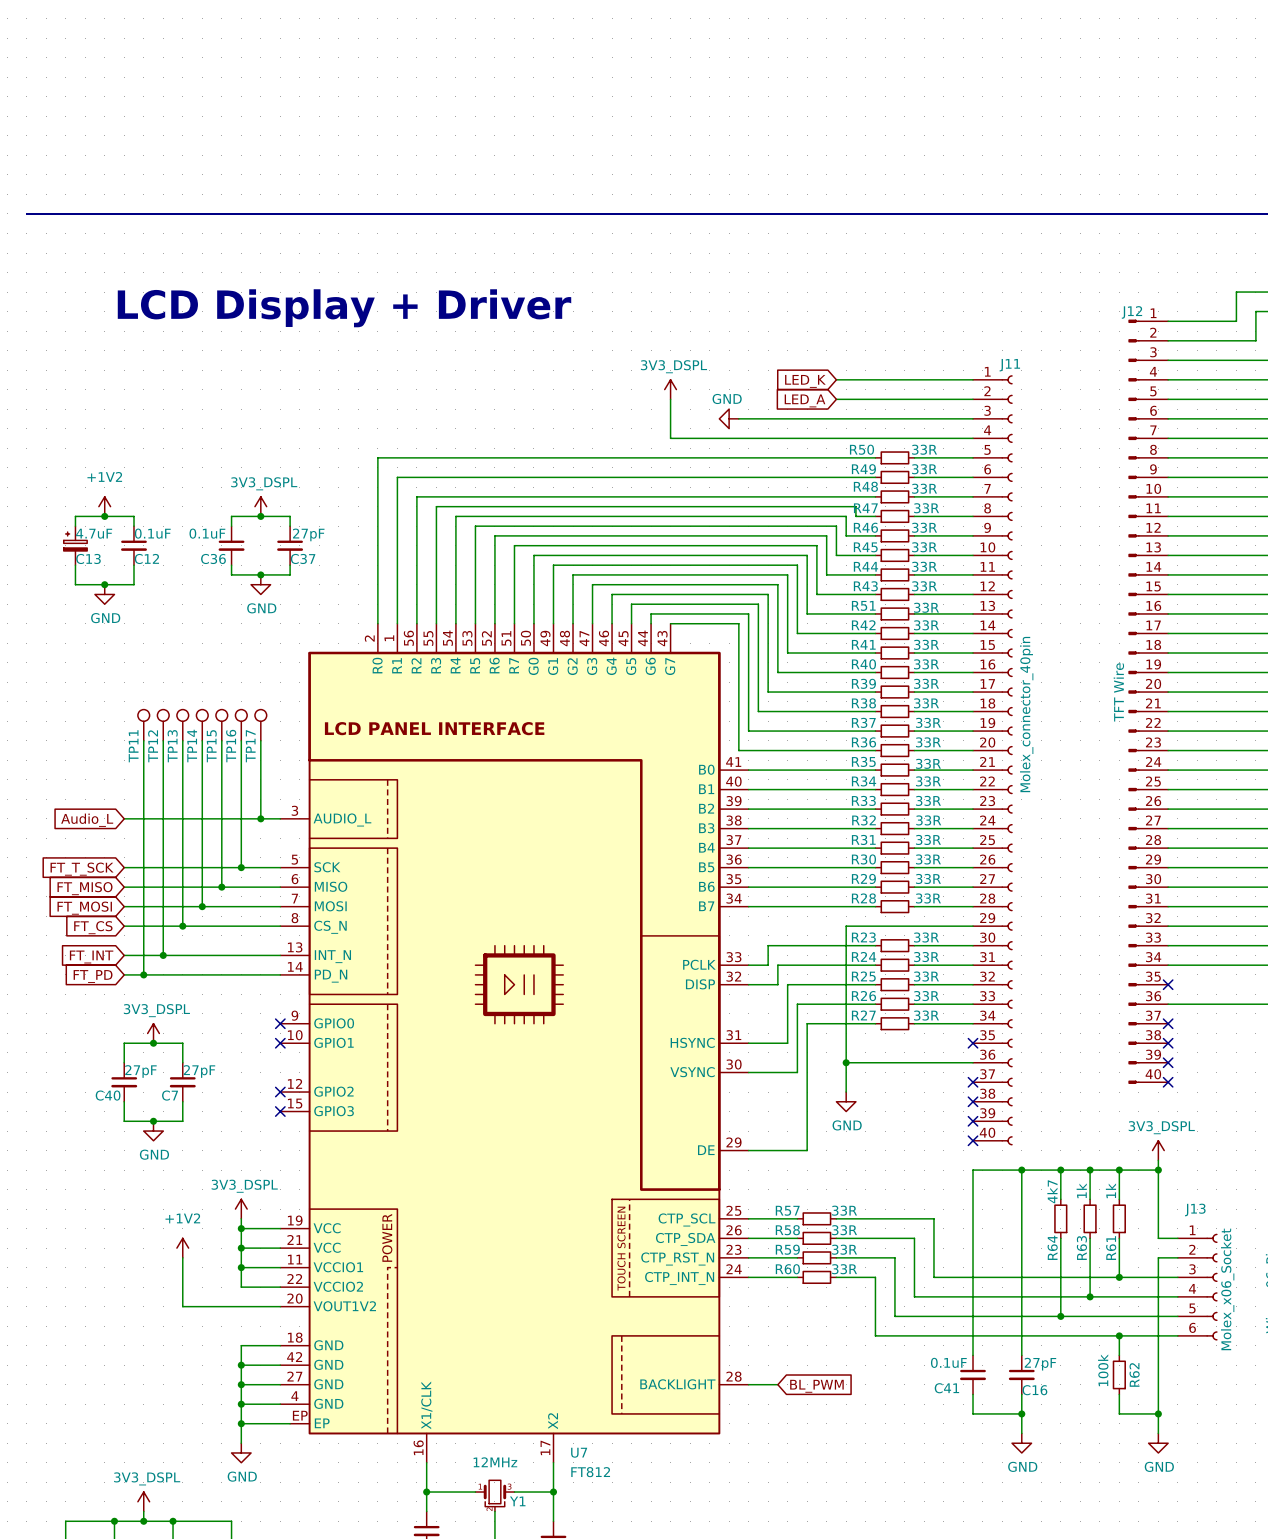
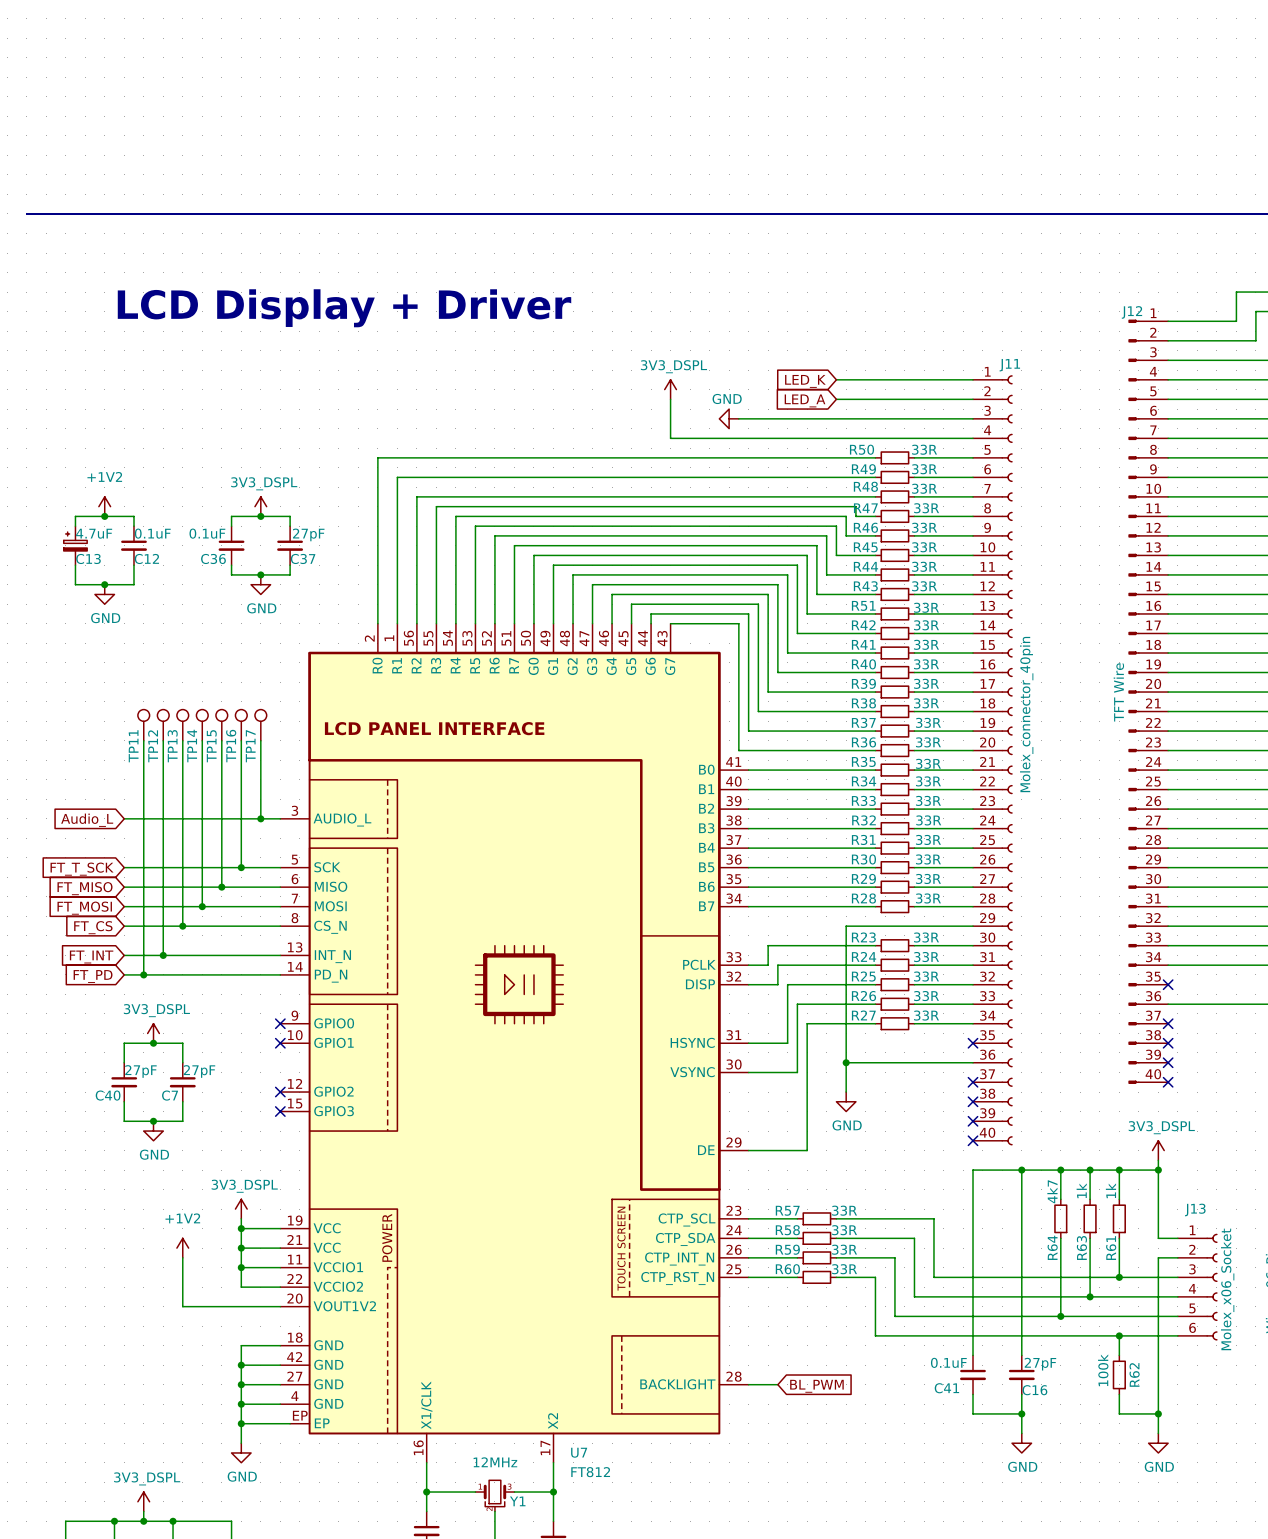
U7 pin number: 25 (733, 1210) -> 23 (733, 1210)
U7 pin number: 26 (734, 1230) -> 24 (734, 1230)
U7 pin number: 23 (733, 1249) -> 26 (734, 1249)
U7 pin name: CTP_RST_N (677, 1258) -> CTP_INT_N (679, 1258)
U7 pin number: 24 (734, 1269) -> 25 (733, 1269)
U7 pin name: CTP_INT_N (679, 1278) -> CTP_RST_N (677, 1278)

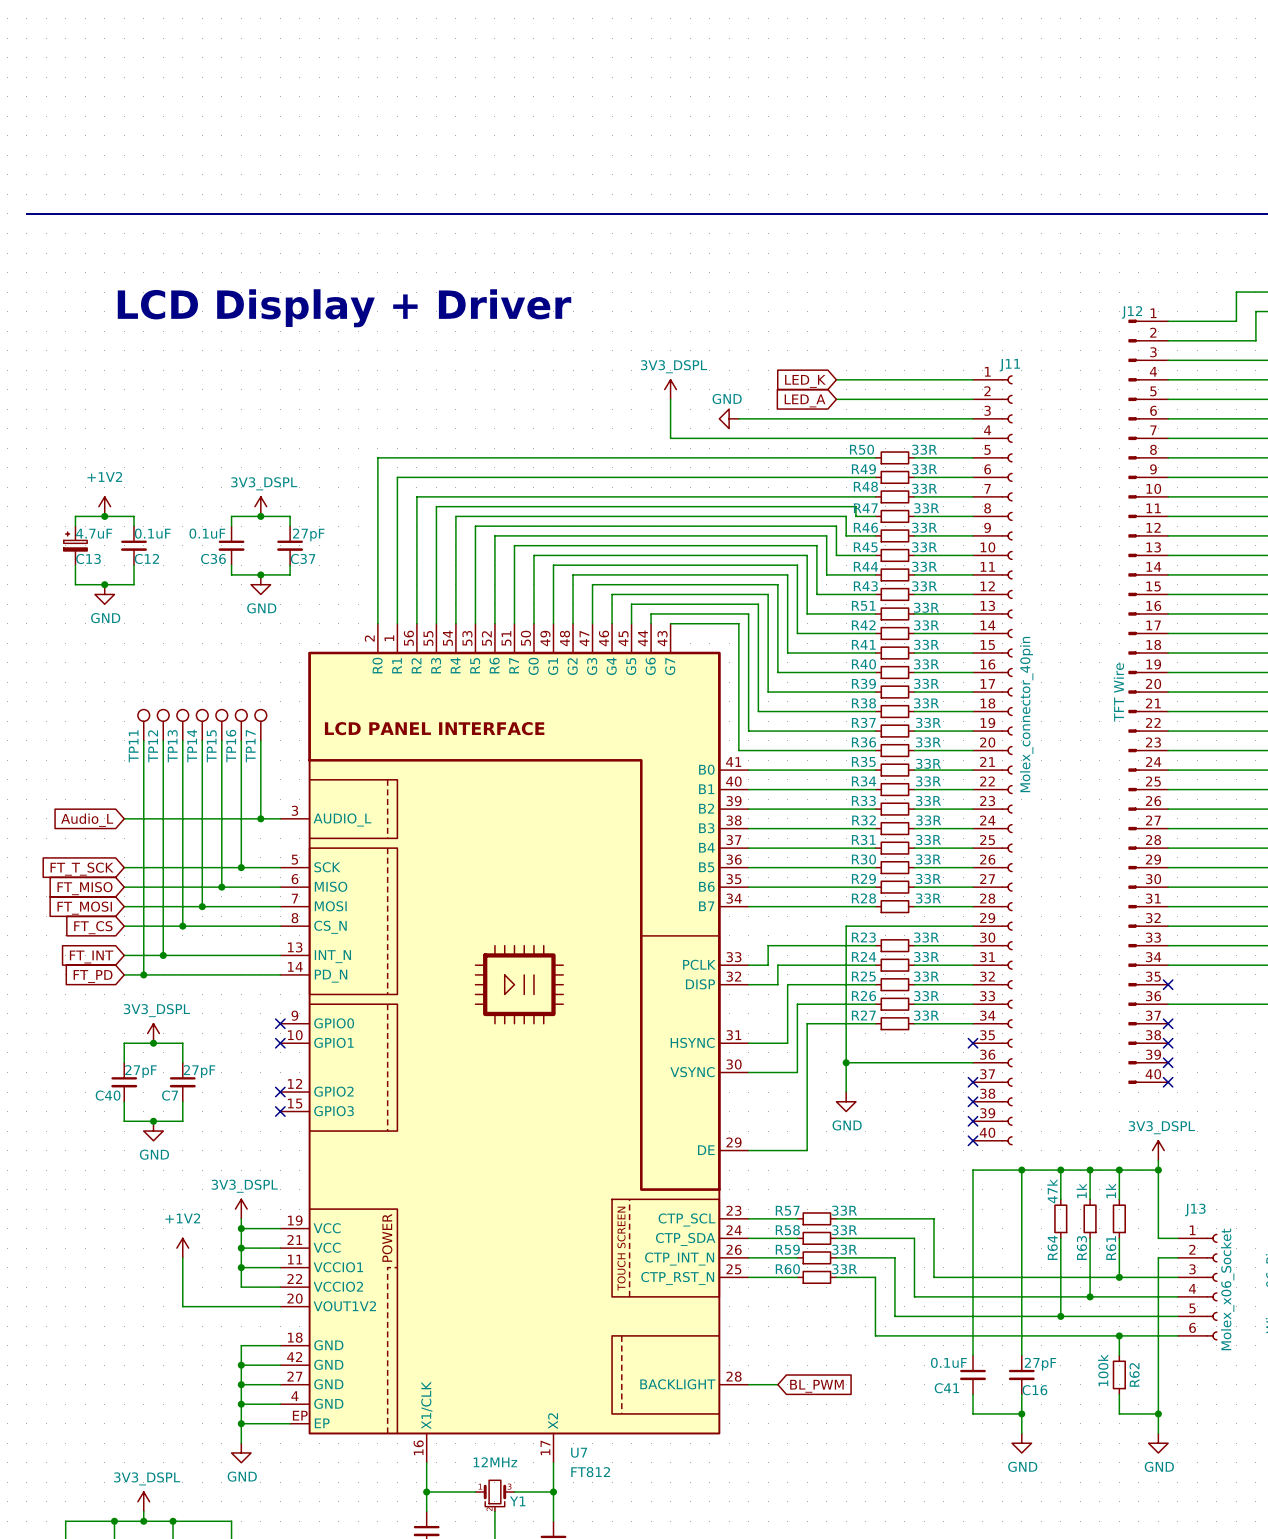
R64 value: 4k7 (1052, 1191) -> 47k (1052, 1191)

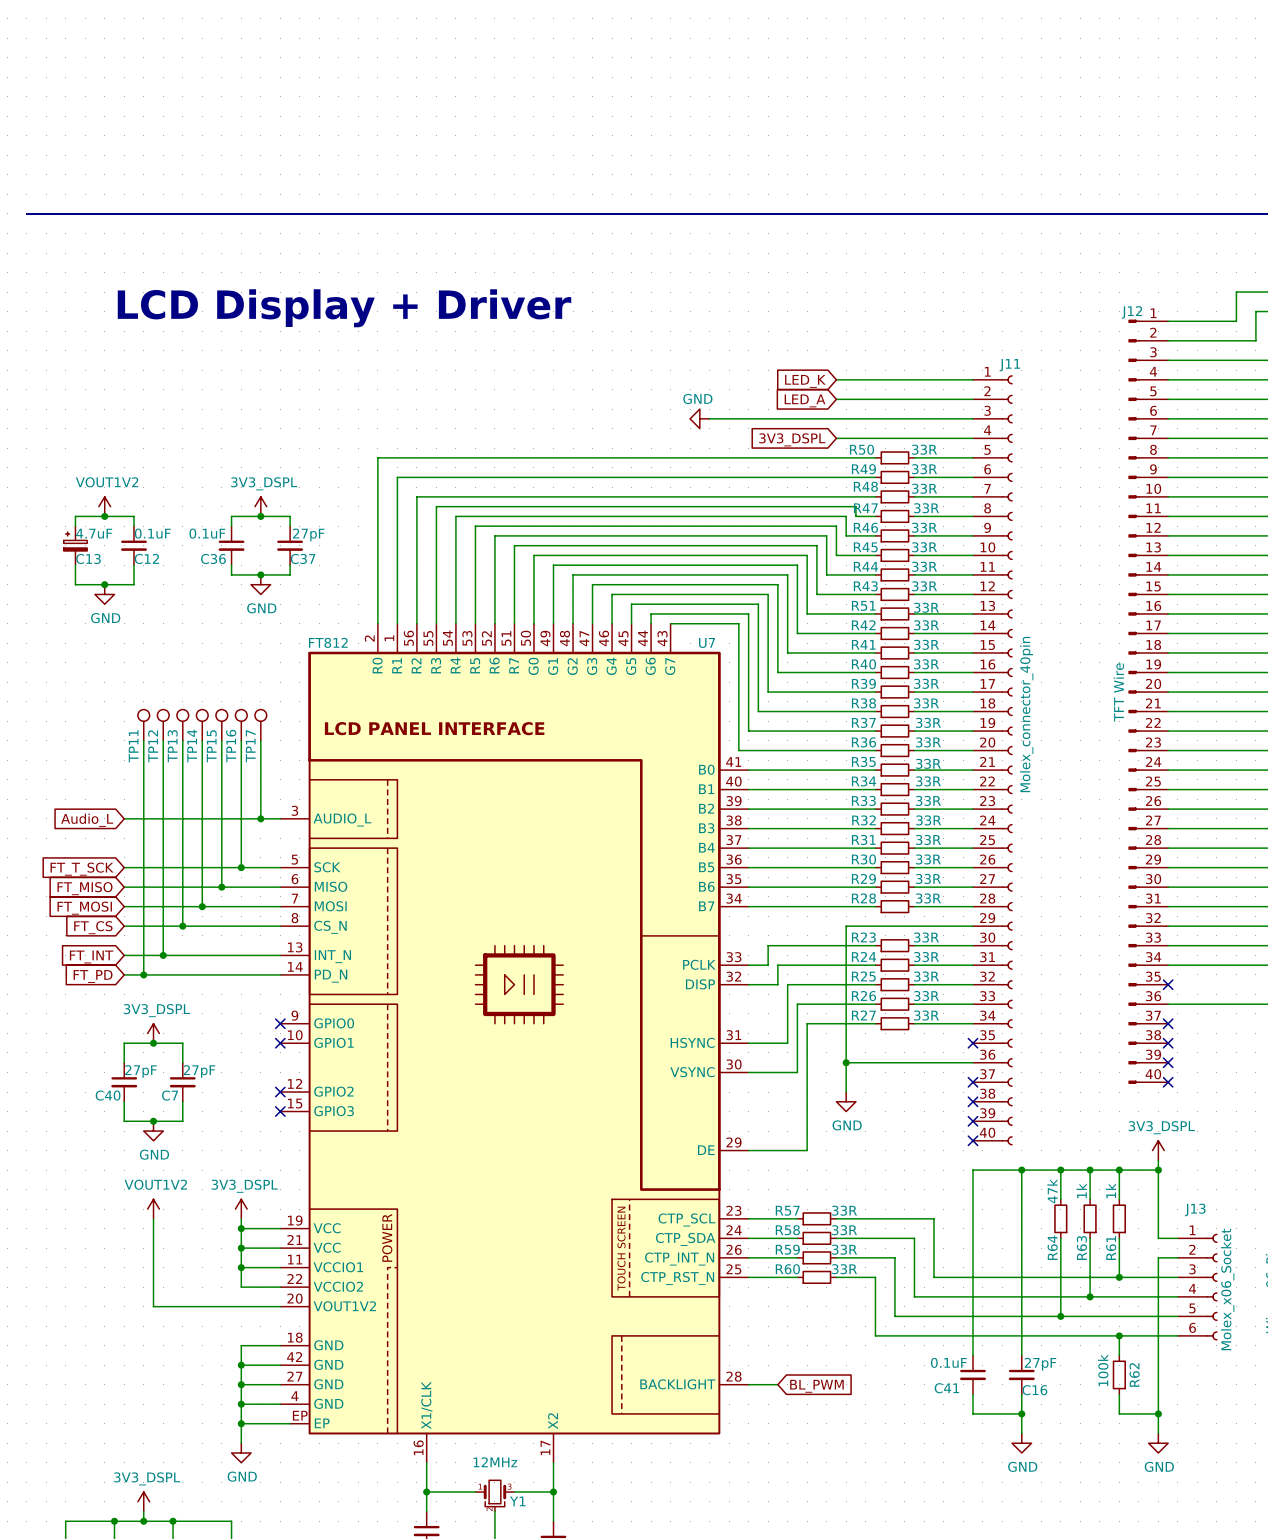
power symbol: 3V3_DSPL (670, 389) -> none
wire: (670, 399) (670, 438) (836, 438) -> none
wire: none -> (709, 418) (738, 418)
power symbol position: GND (729, 418) -> GND (699, 418)
global label: none -> 3V3_DSPL (792, 439)
power symbol: +1V2 (104, 506) -> VOUT1V2 (104, 506)
power symbol: none -> VOUT1V2 (153, 1209)
power symbol: +1V2 (182, 1248) -> none
wire: (182, 1257) (182, 1306) -> (153, 1218) (153, 1306) (182, 1306)
U7 name position: U7 (579, 1452) -> U7 (707, 642)
U7 value position: FT812 (590, 1472) -> FT812 (328, 642)

